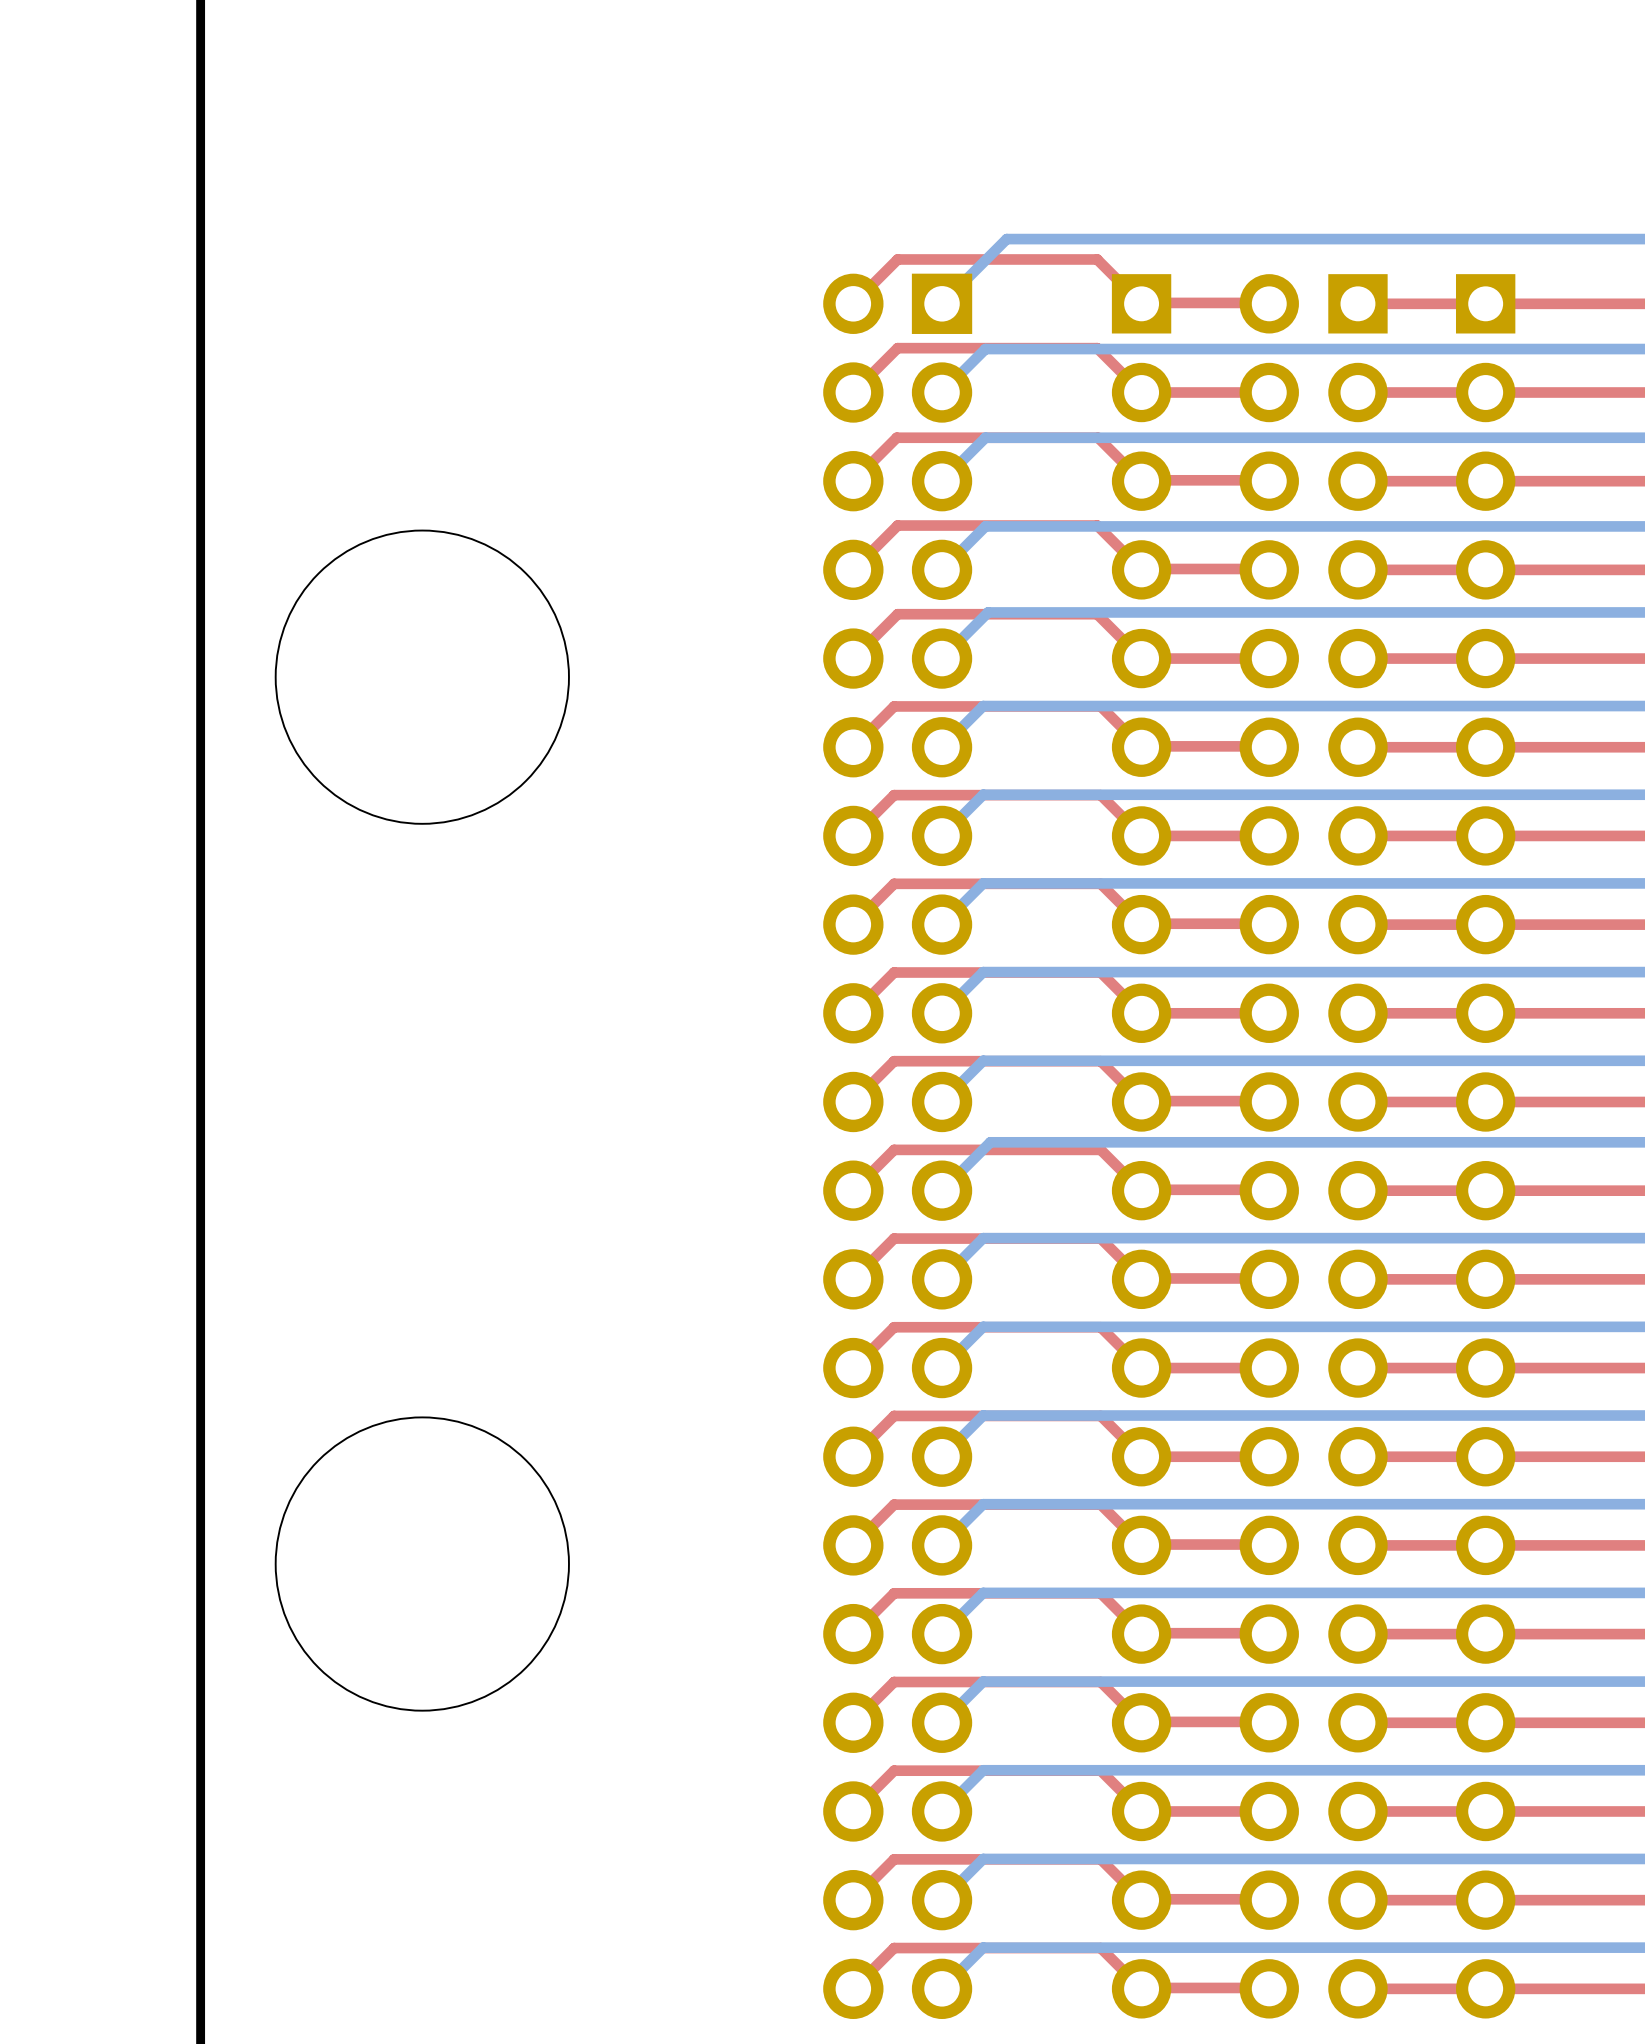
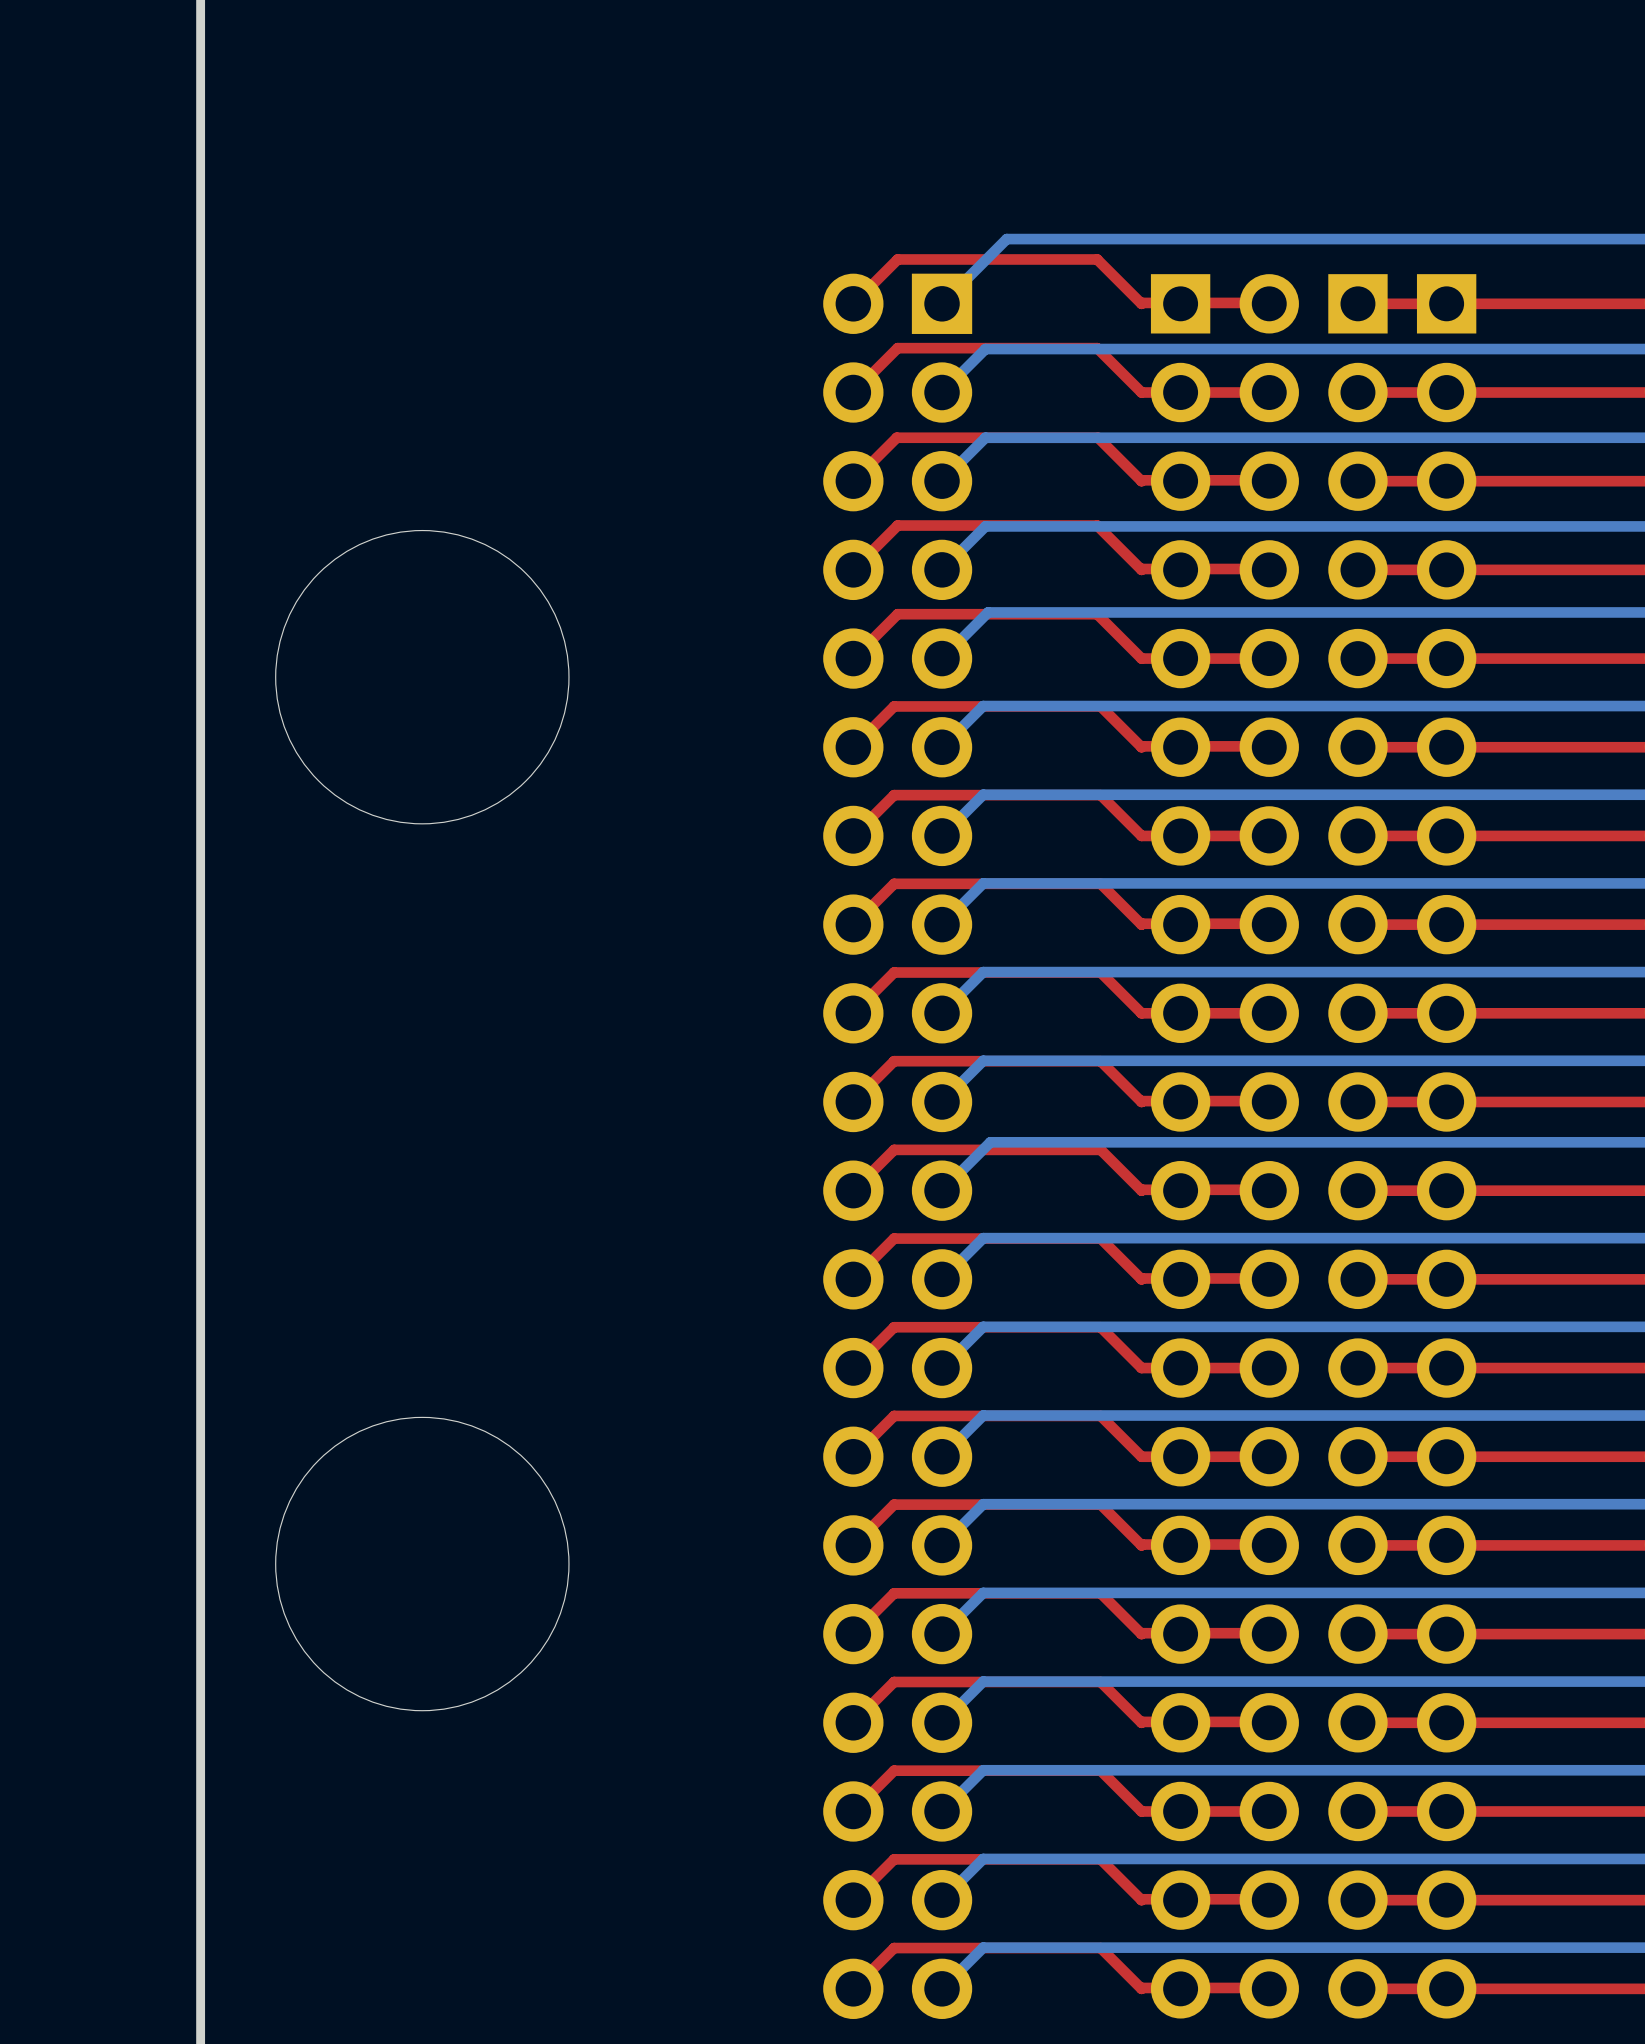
part position: (1141, 1146) -> (1180, 1146)
part position: (1485, 1146) -> (1446, 1146)

